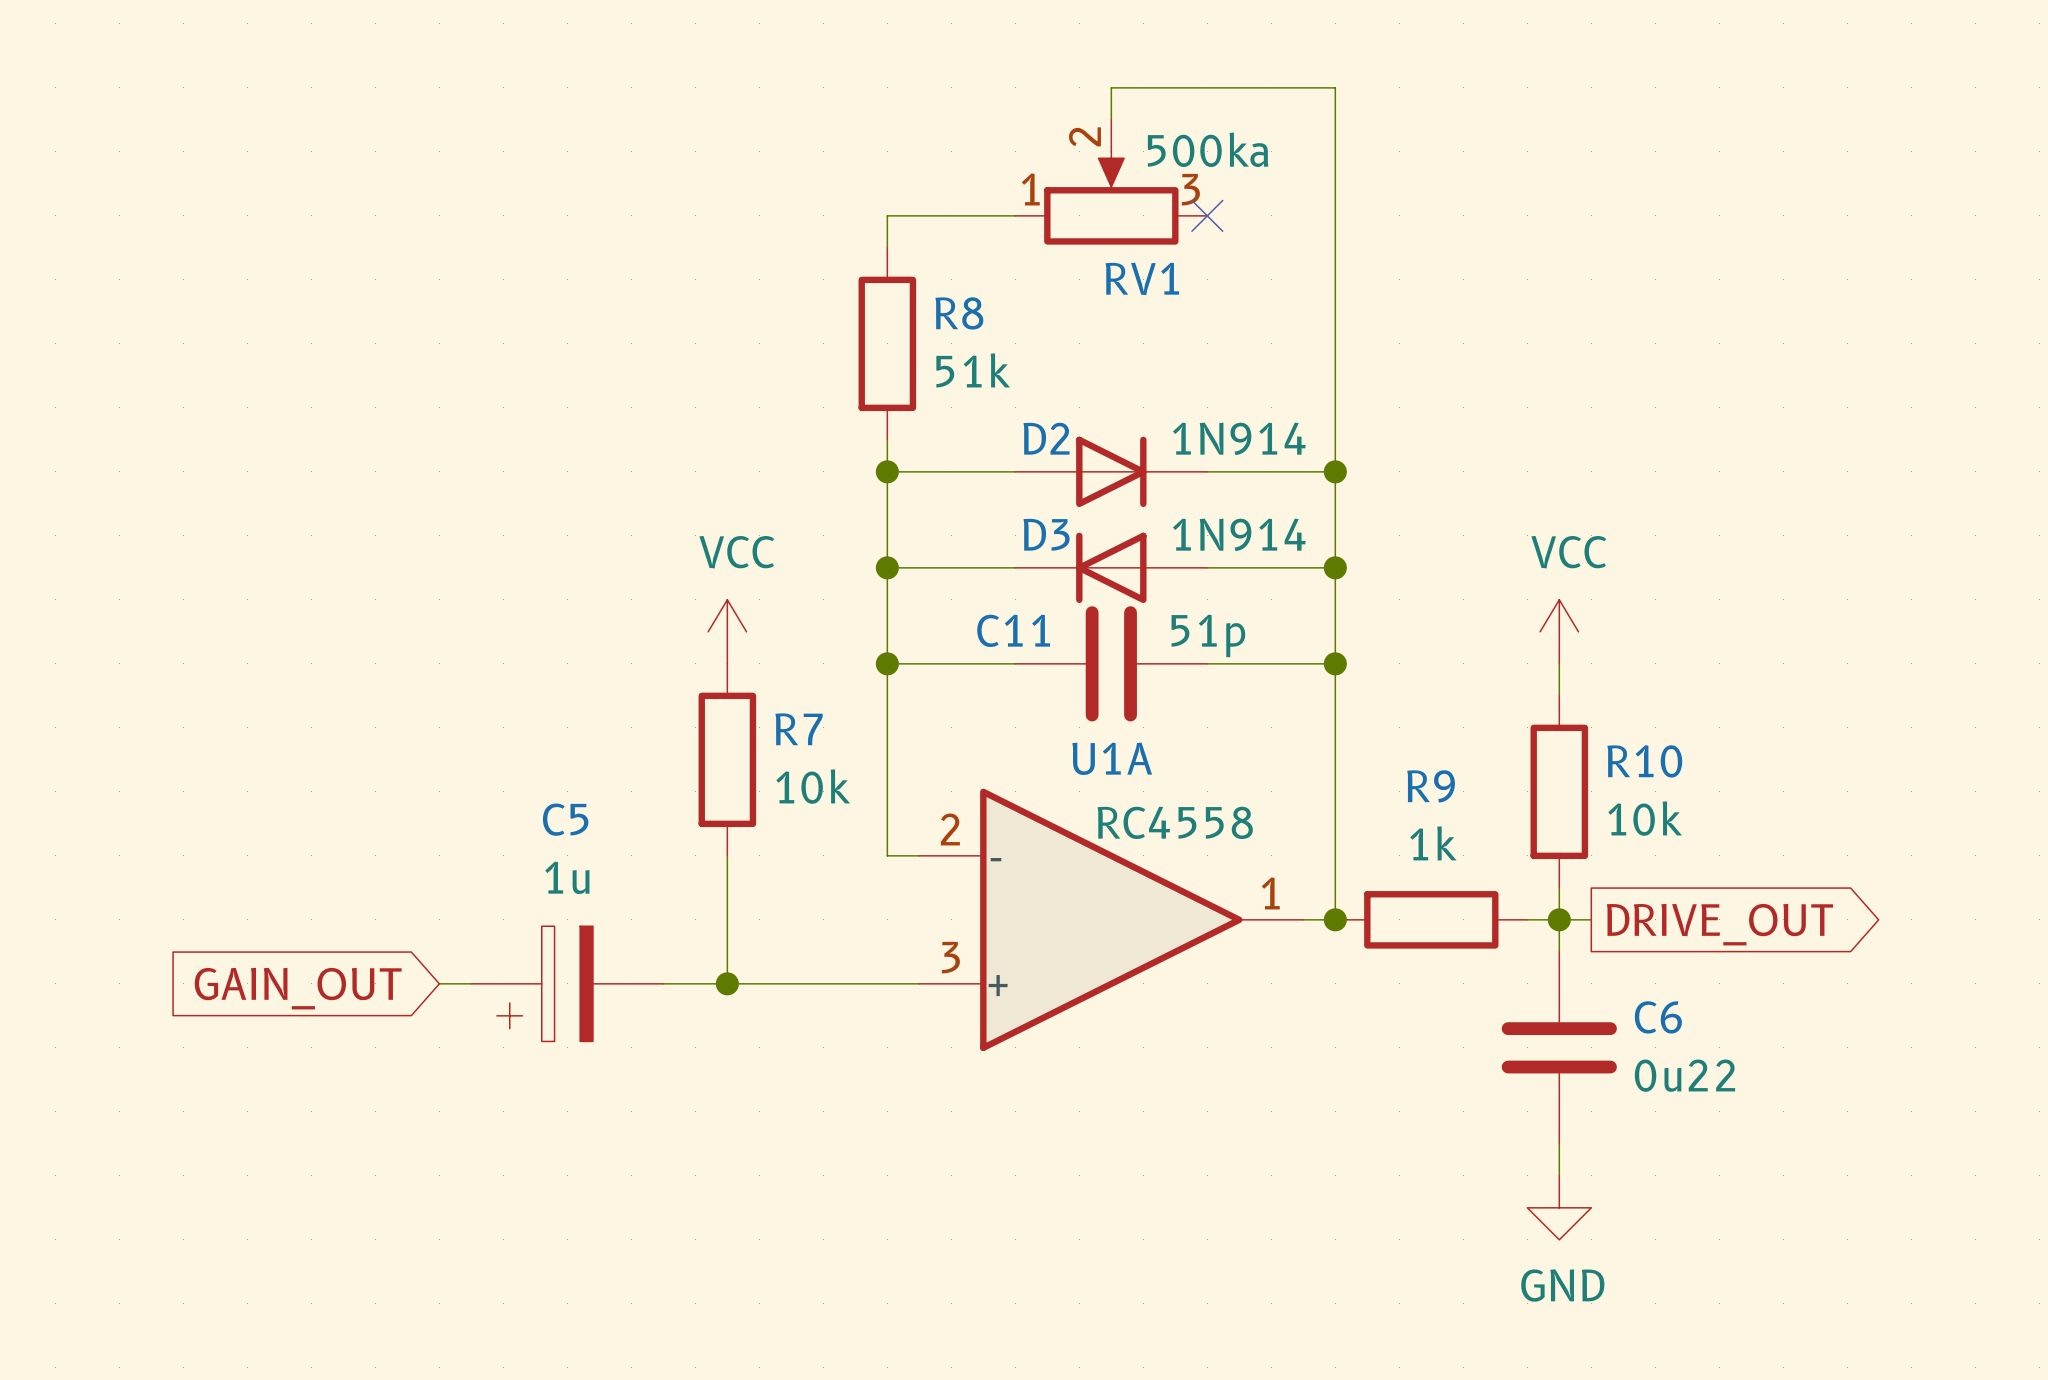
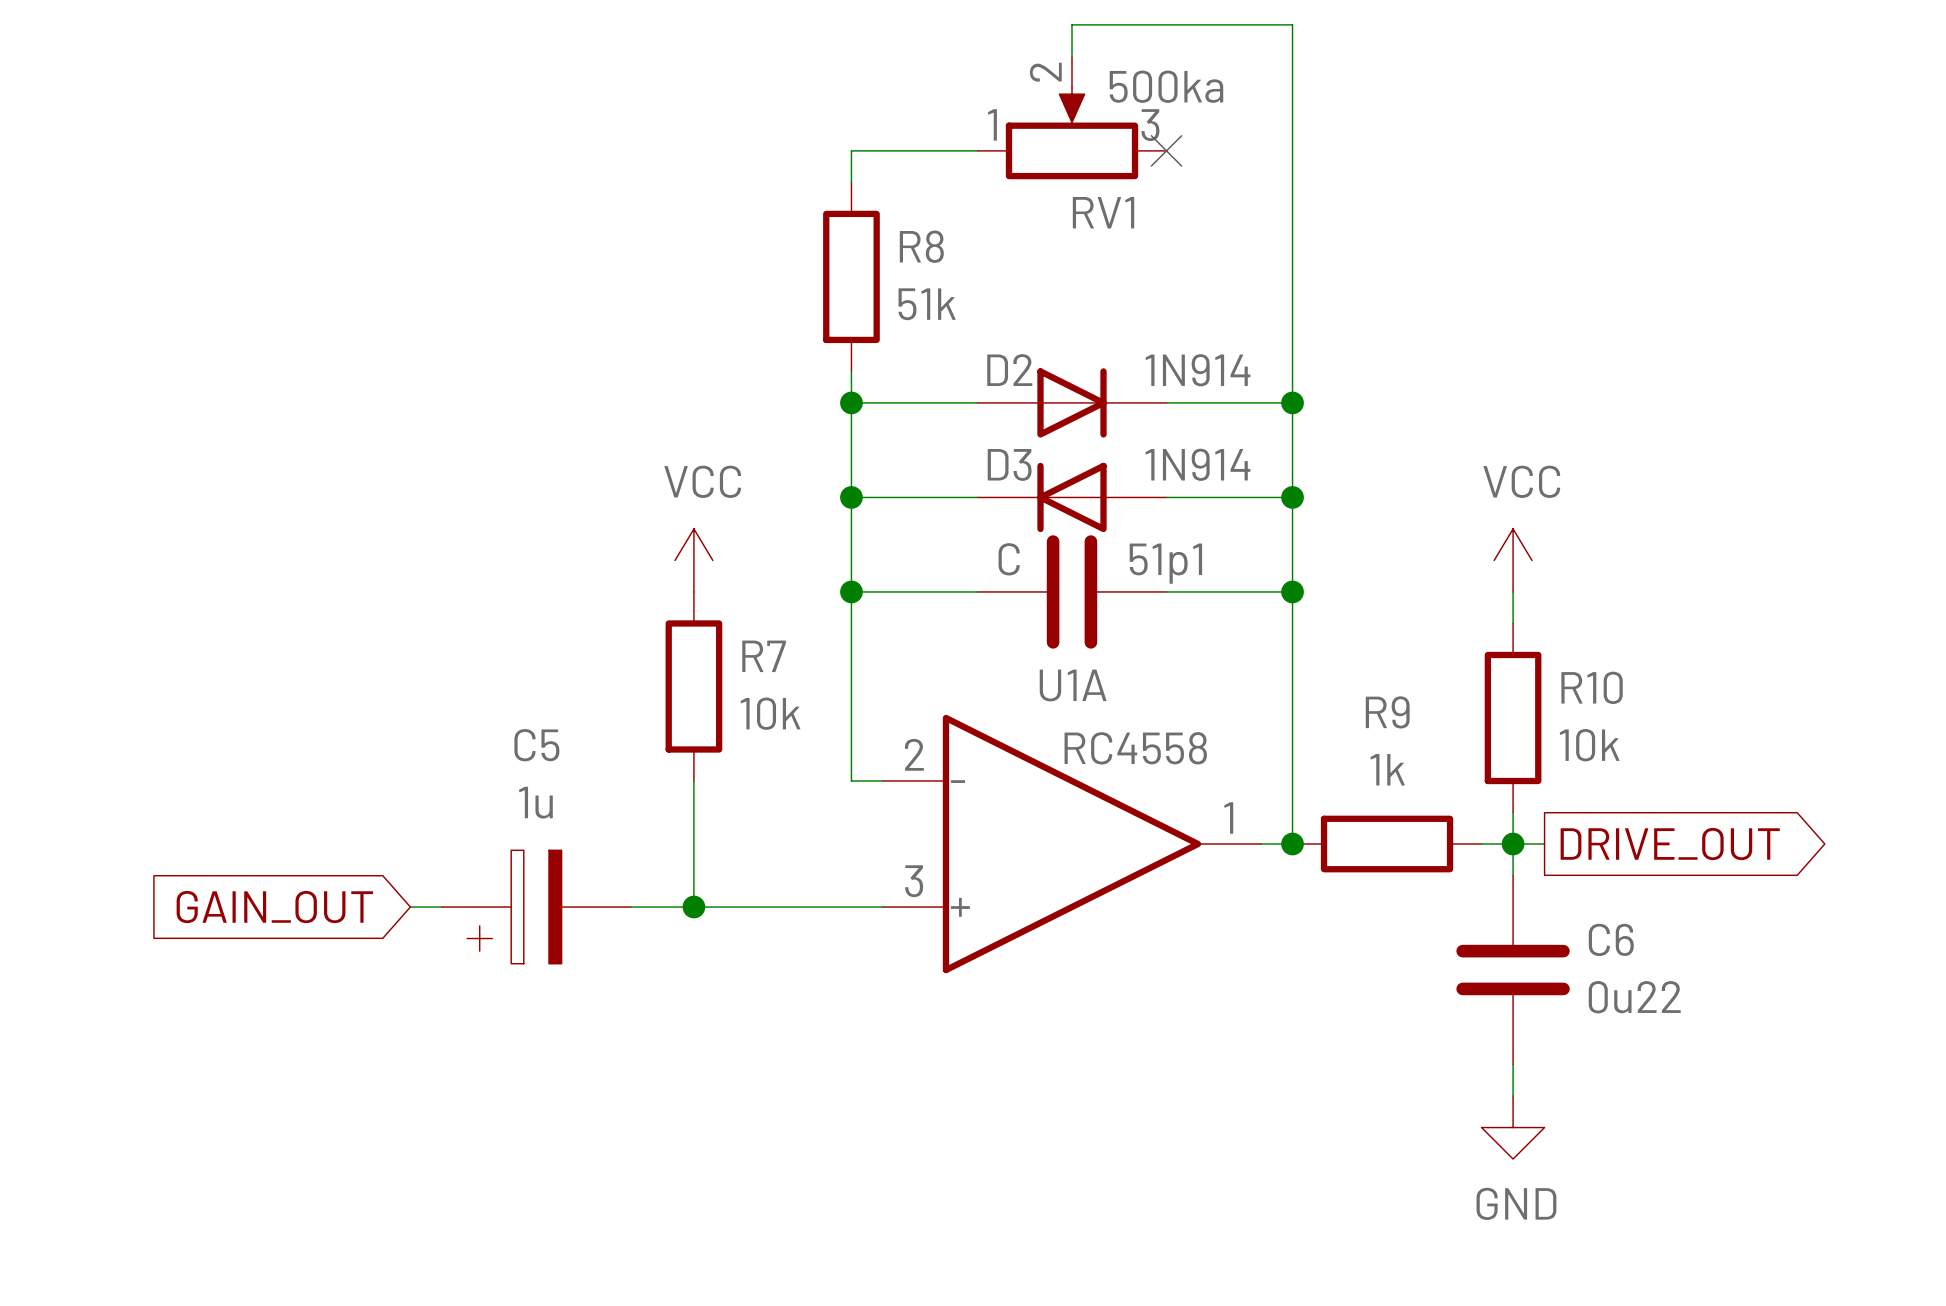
C11 name: C11 (1013, 630) -> 51p1 (1165, 563)
C11 value: 51p (1208, 635) -> C (1009, 559)

